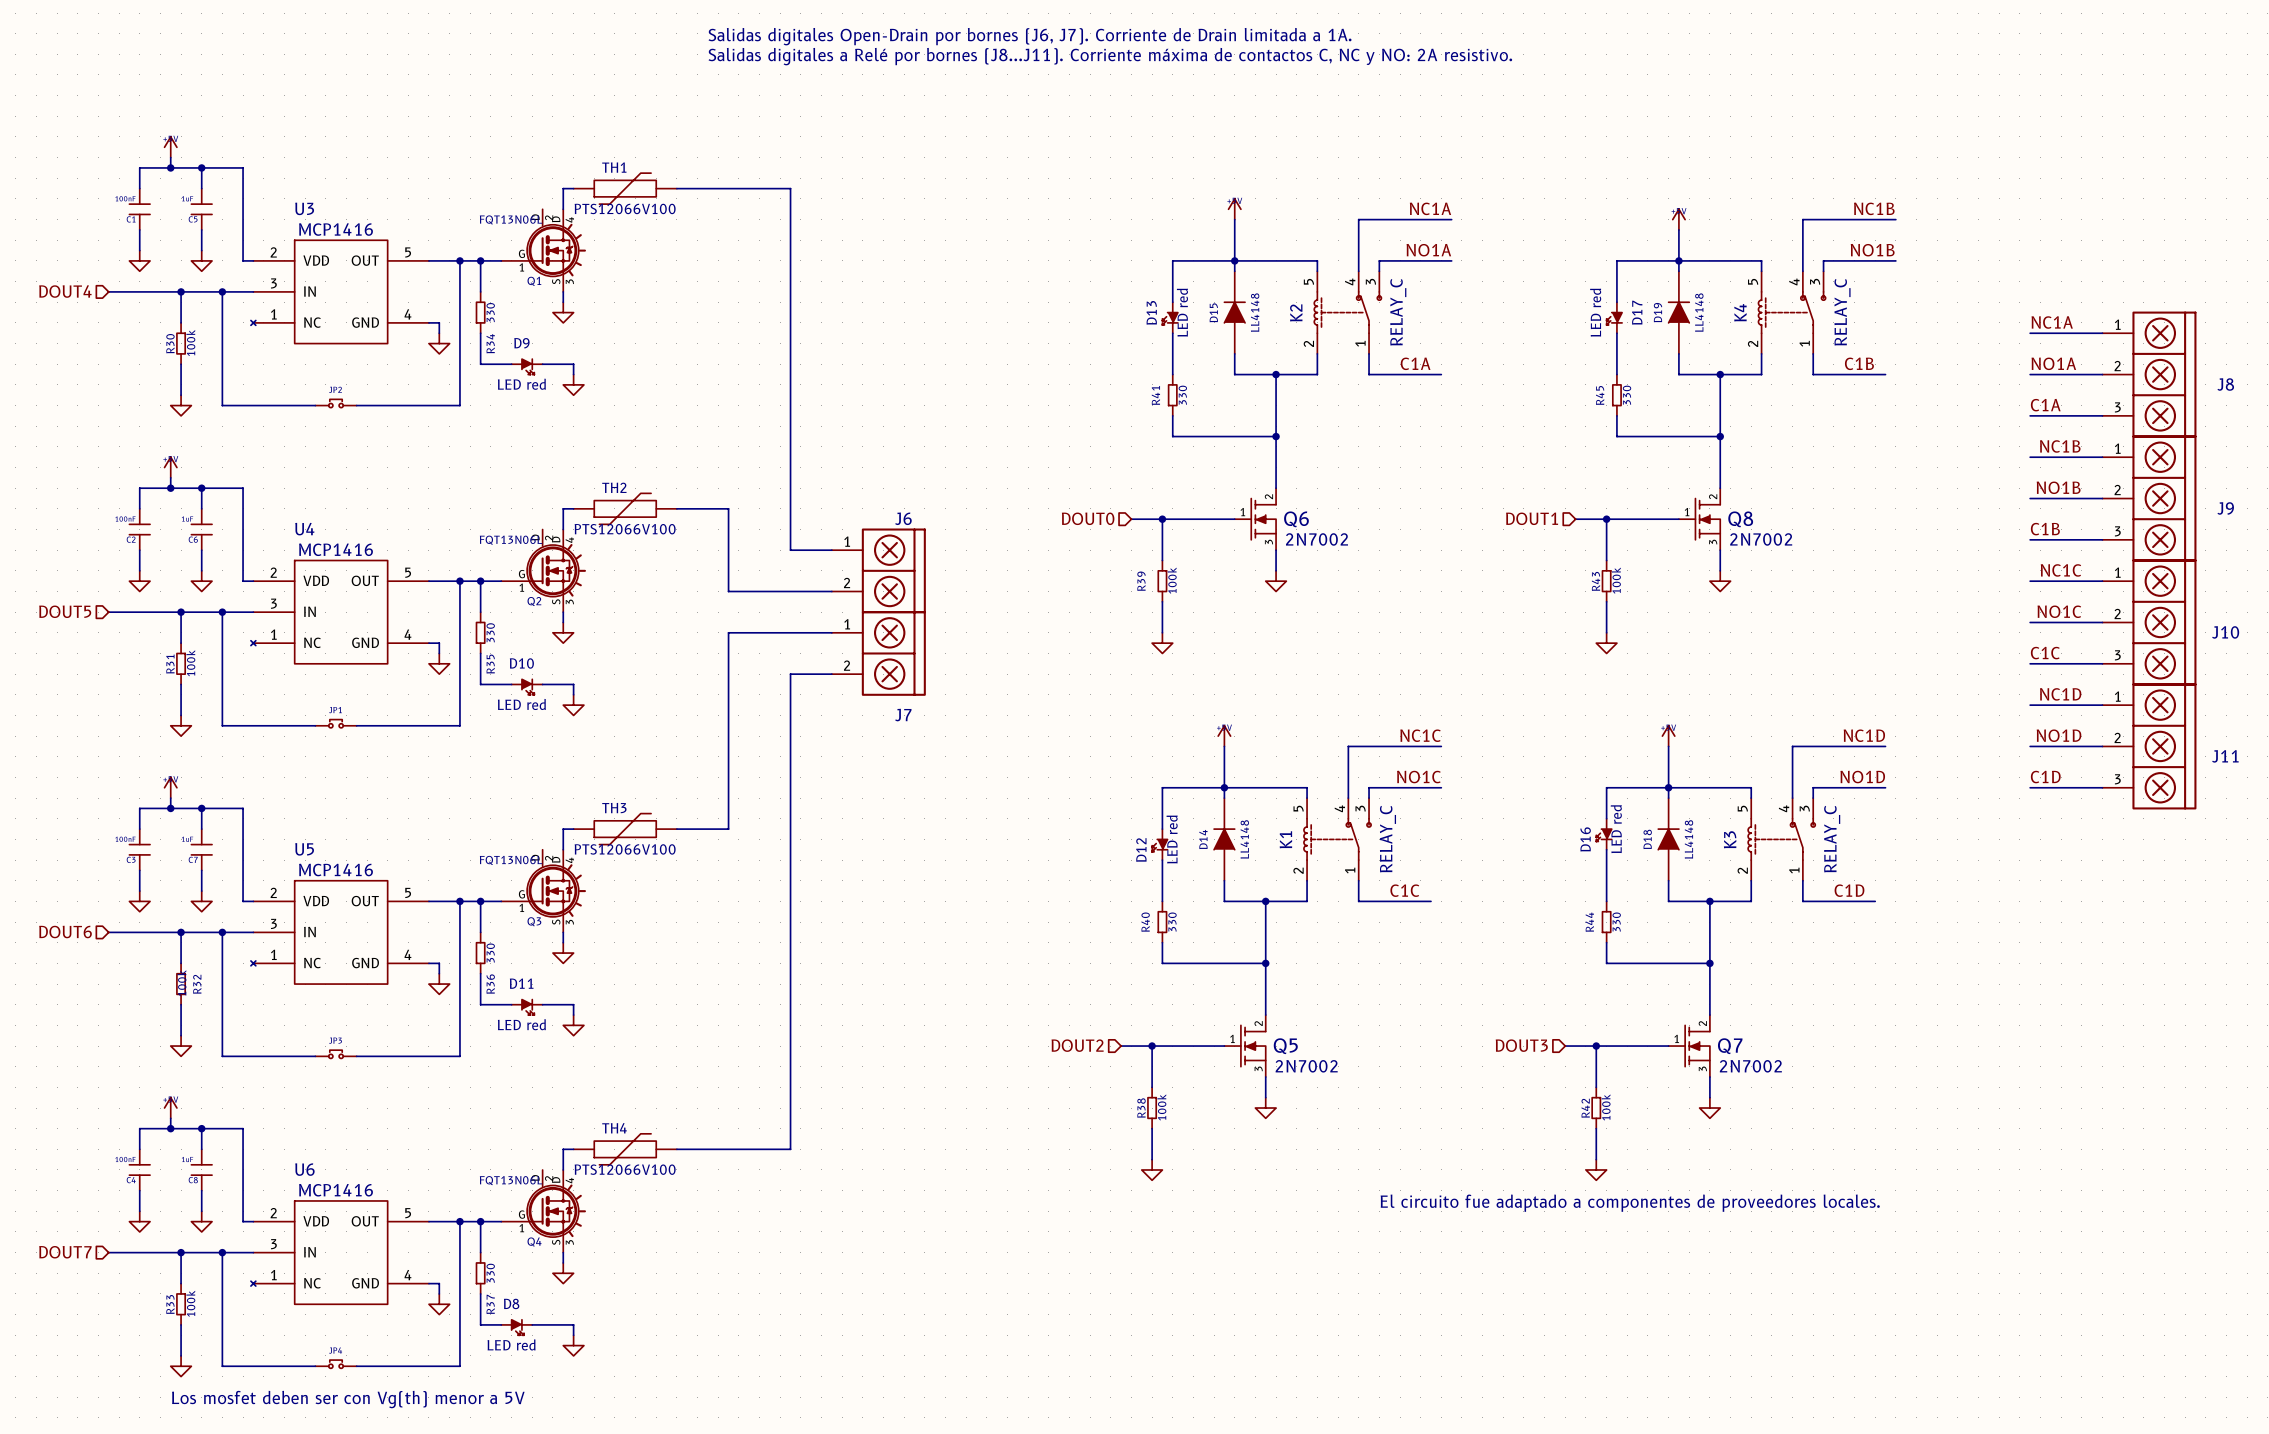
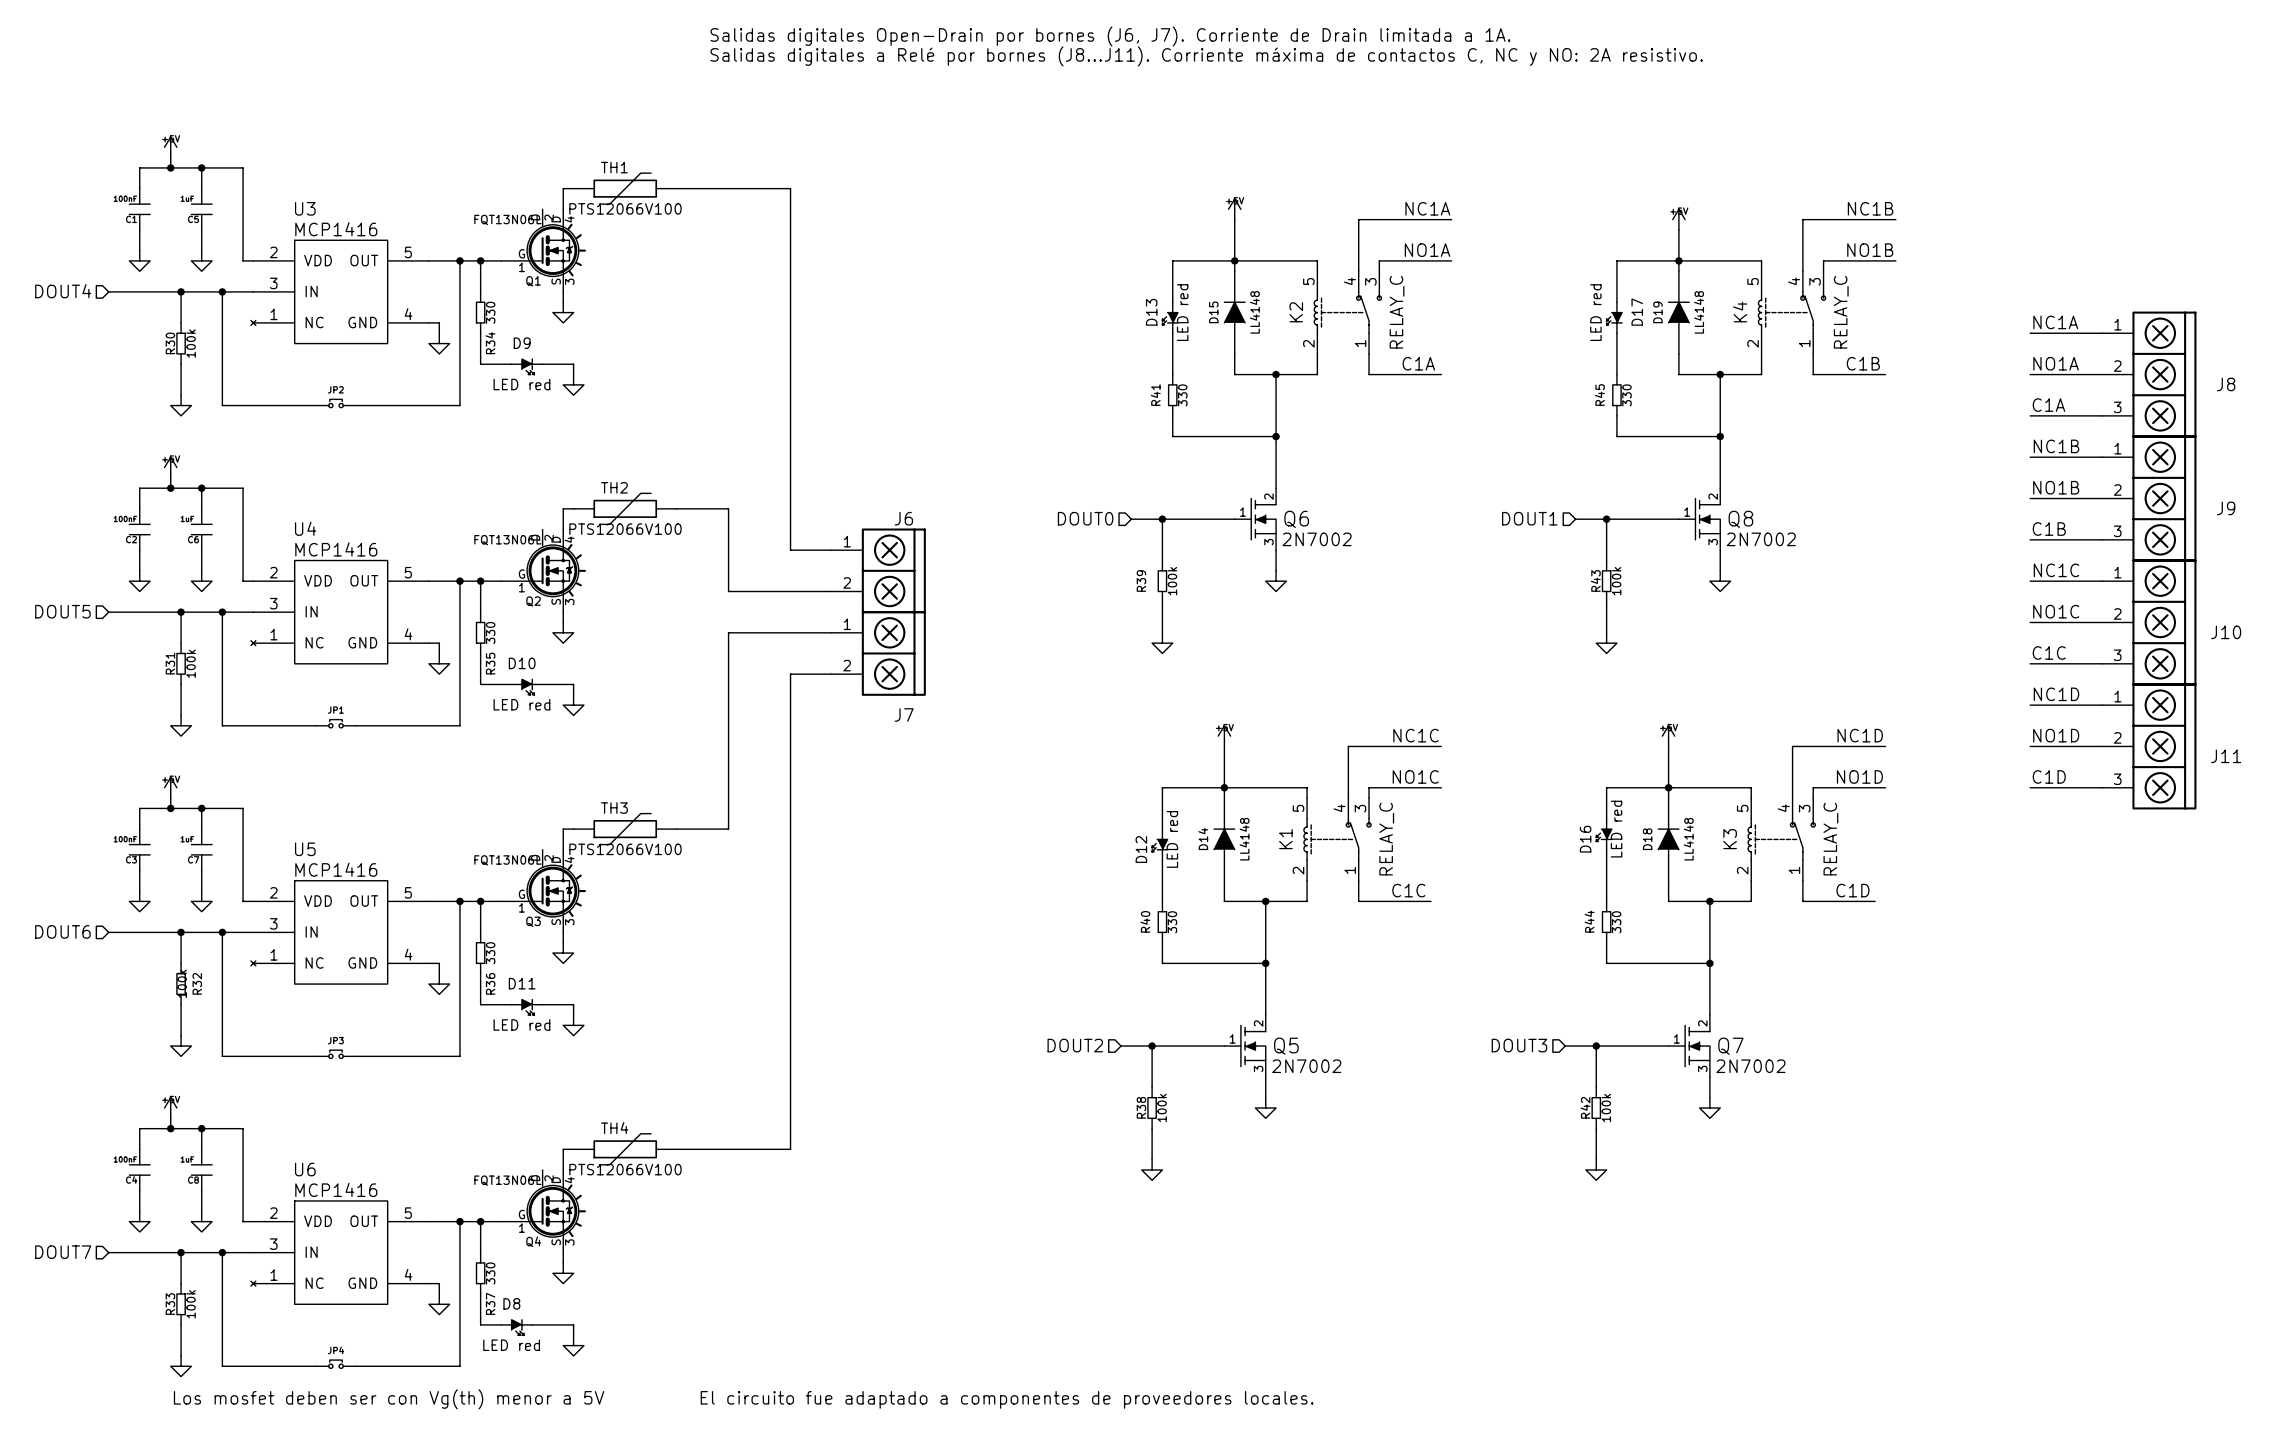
text: El circuito fue adaptado a componentes de proveedores locales. (1630, 1203) -> none
text: none -> El circuito fue adaptado a componentes de proveedores locales. (1007, 1399)

